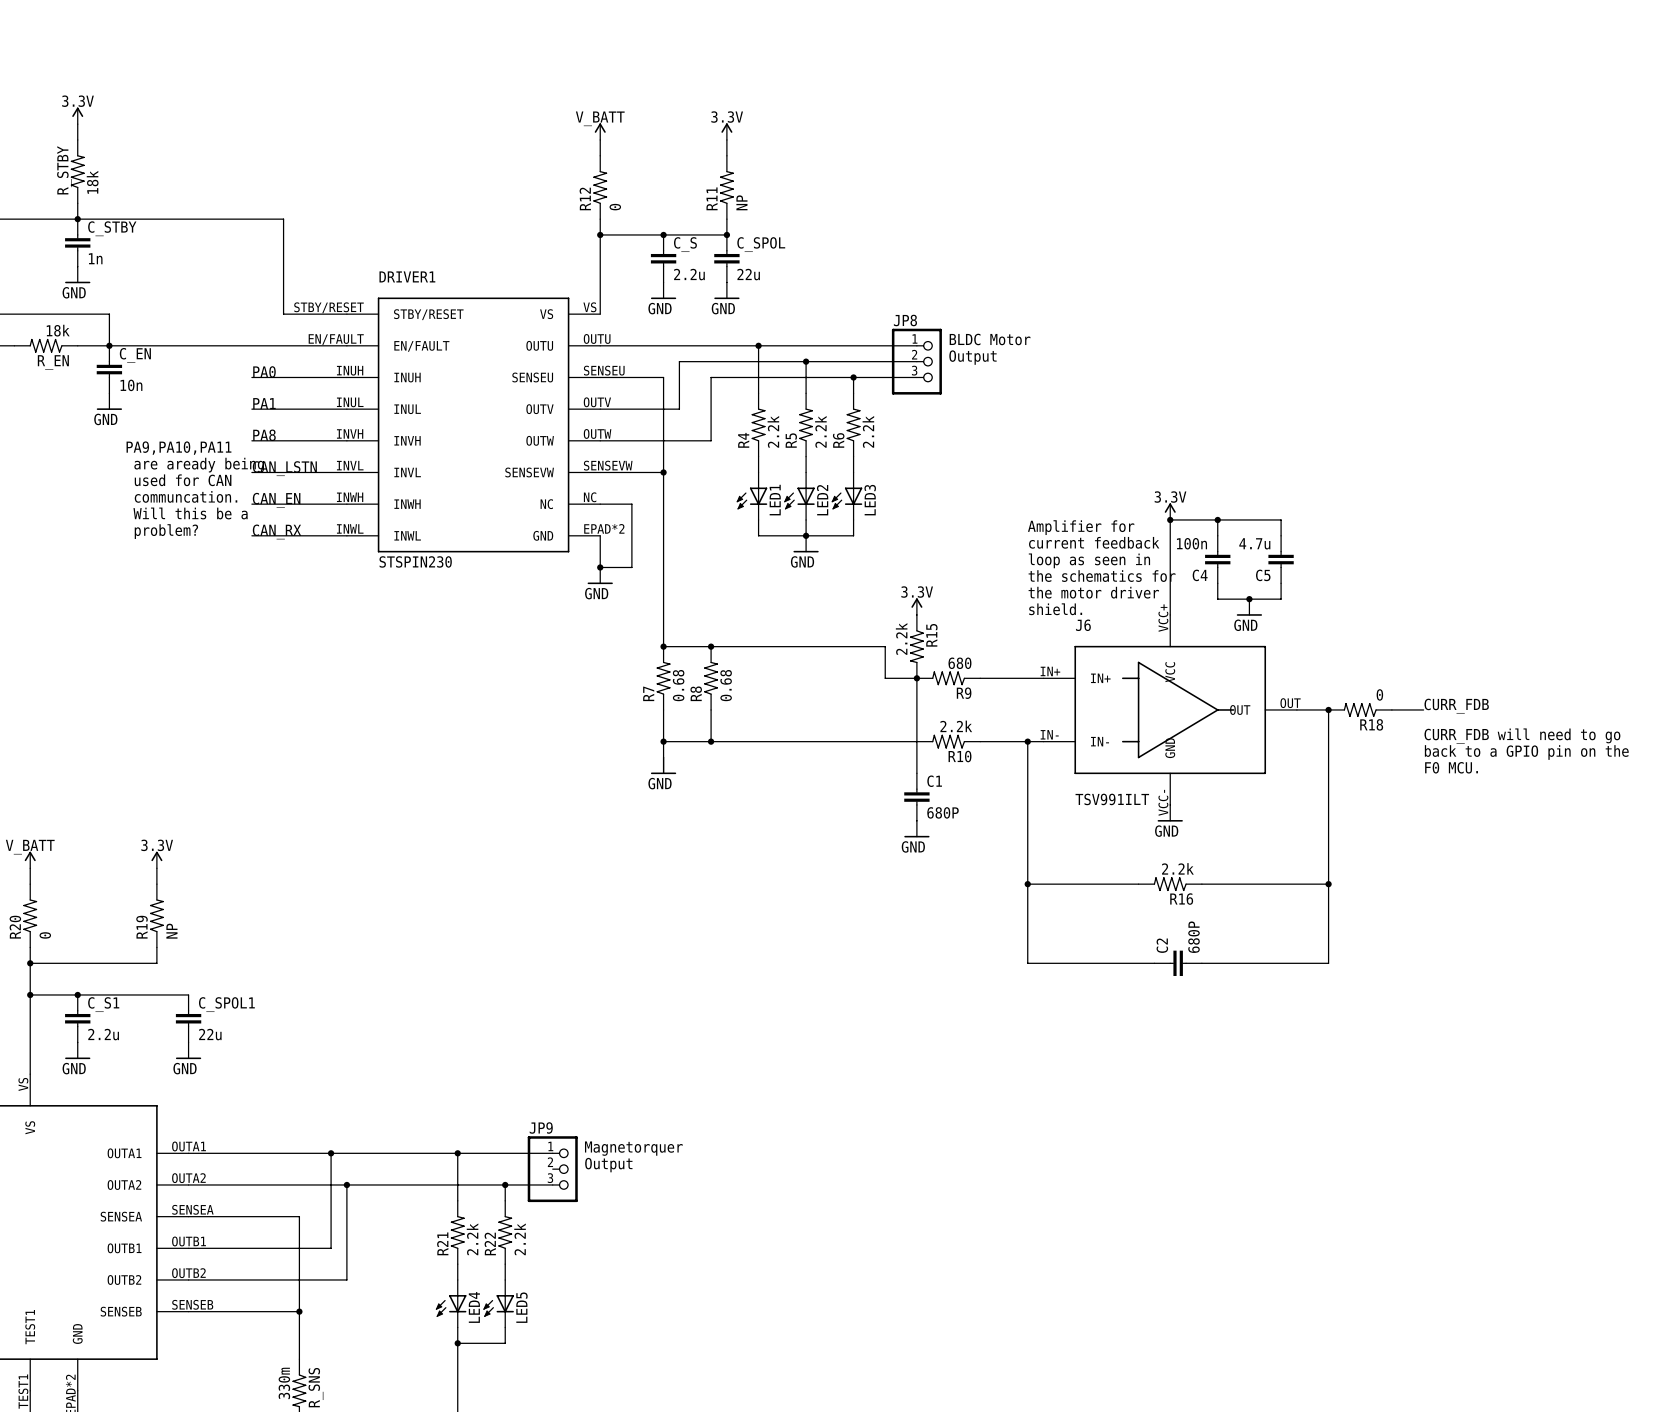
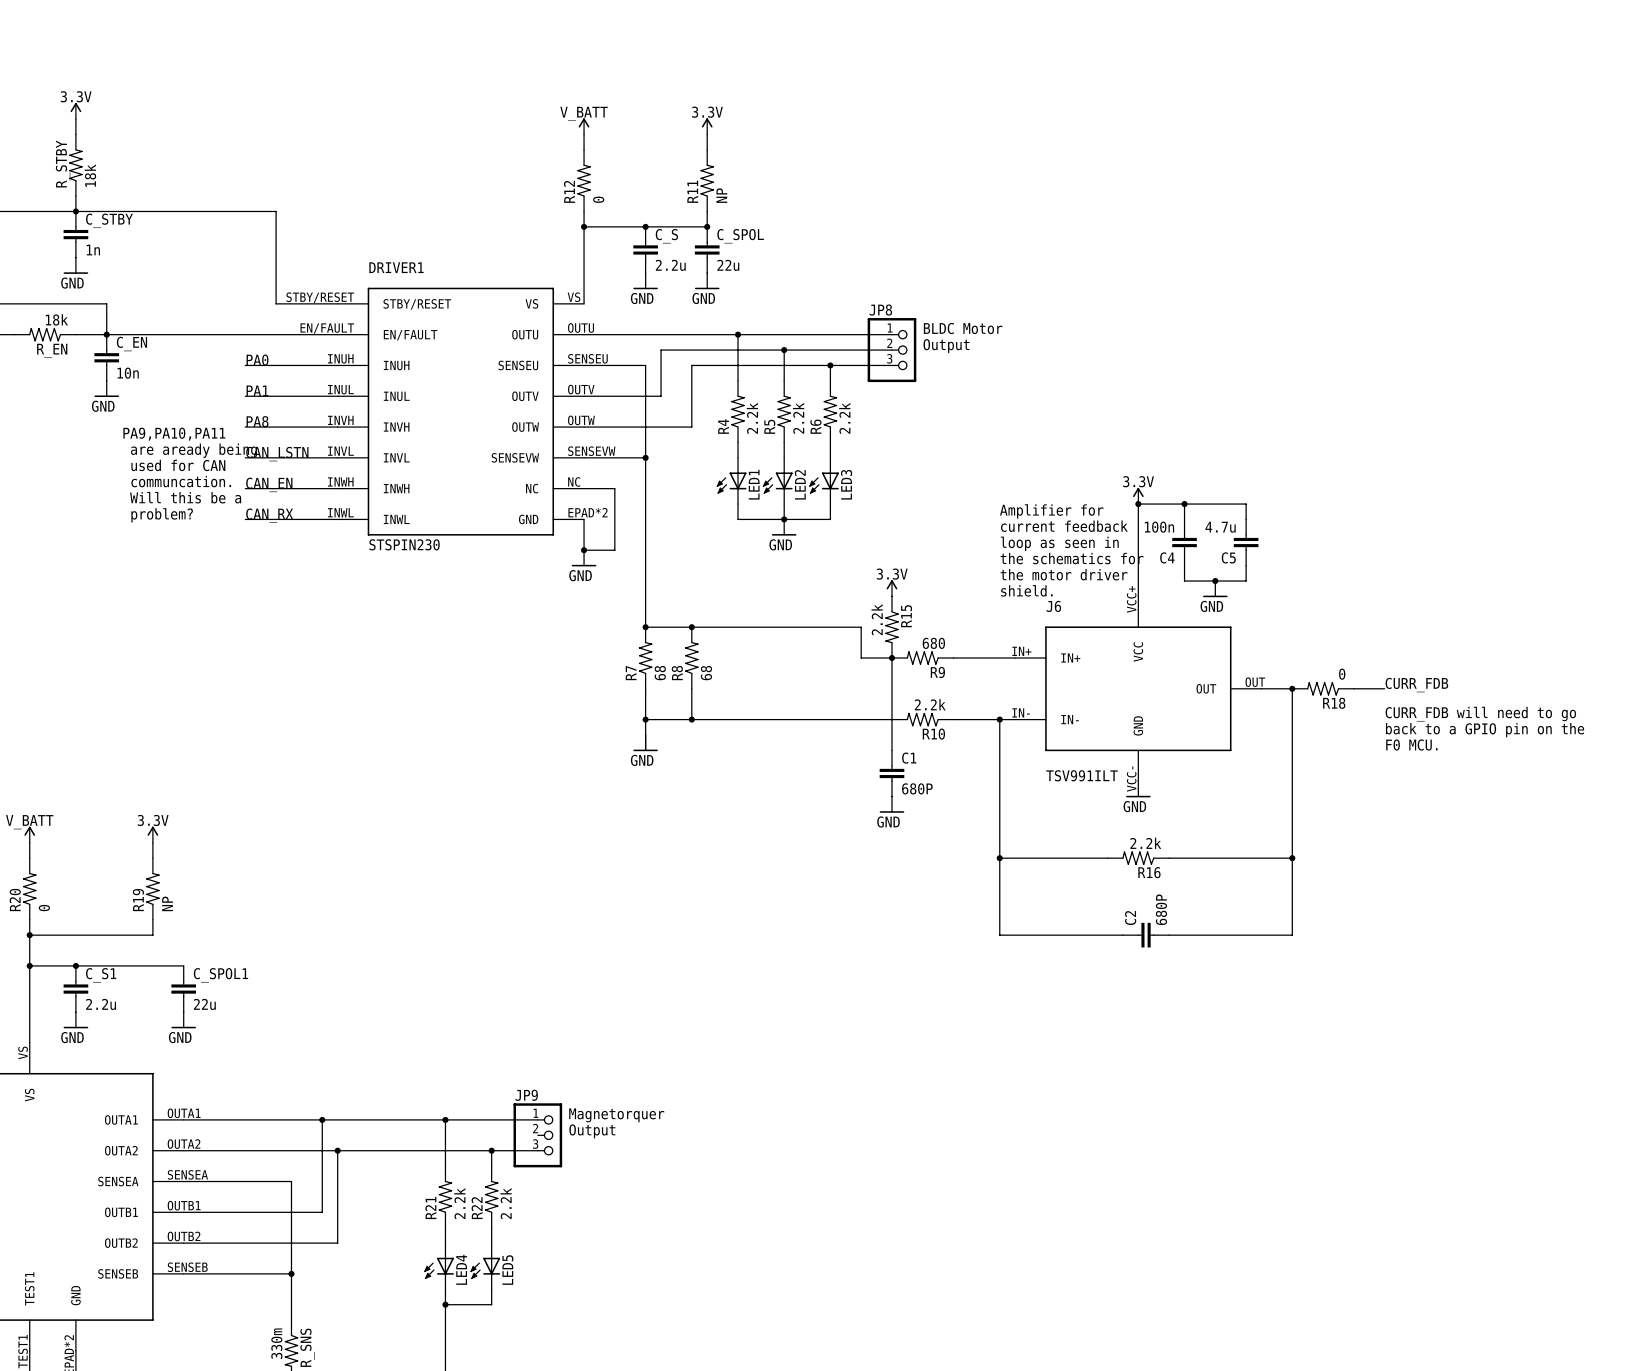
J6 symbol: [1043, 614, 1297, 805] -> [1015, 596, 1262, 782]
R7 value: 0.68 (678, 685) -> 68 (660, 673)
R8 value: 0.68 (726, 685) -> 68 (706, 673)

